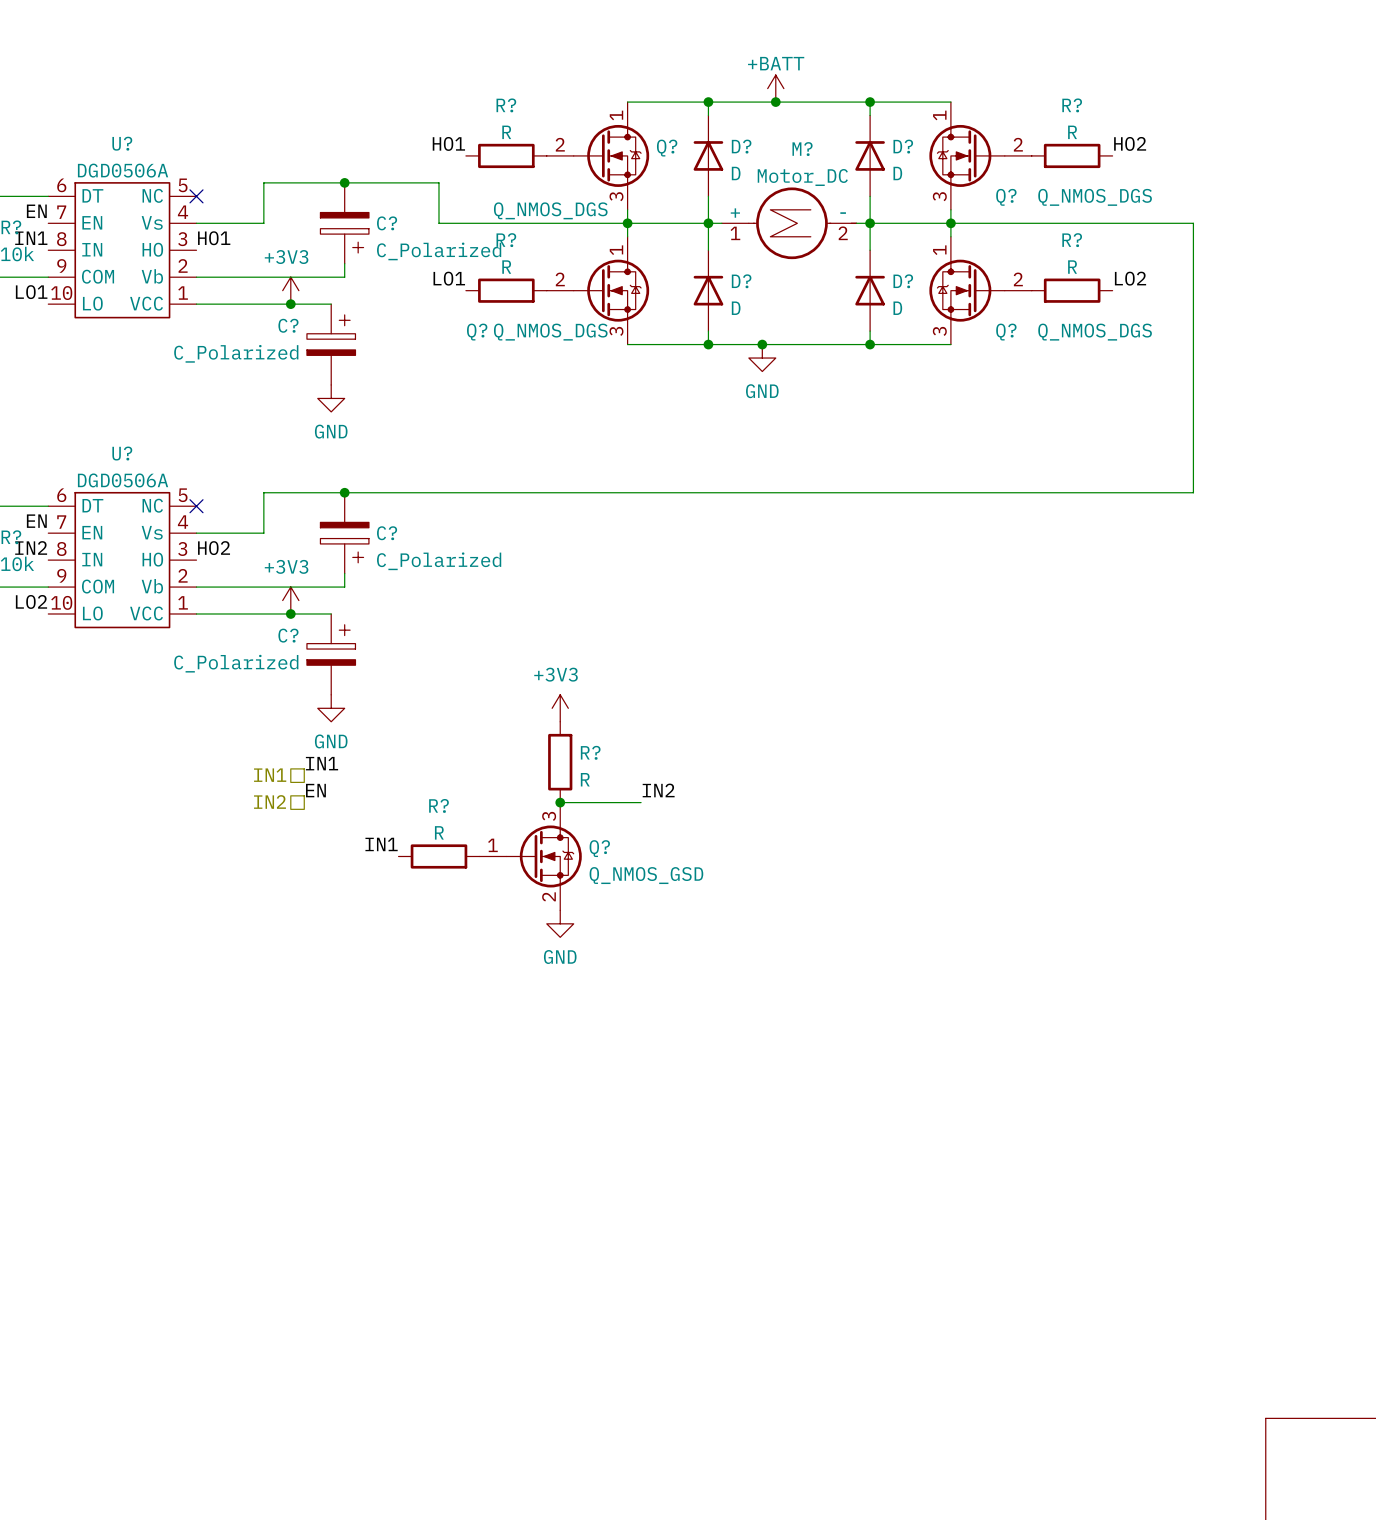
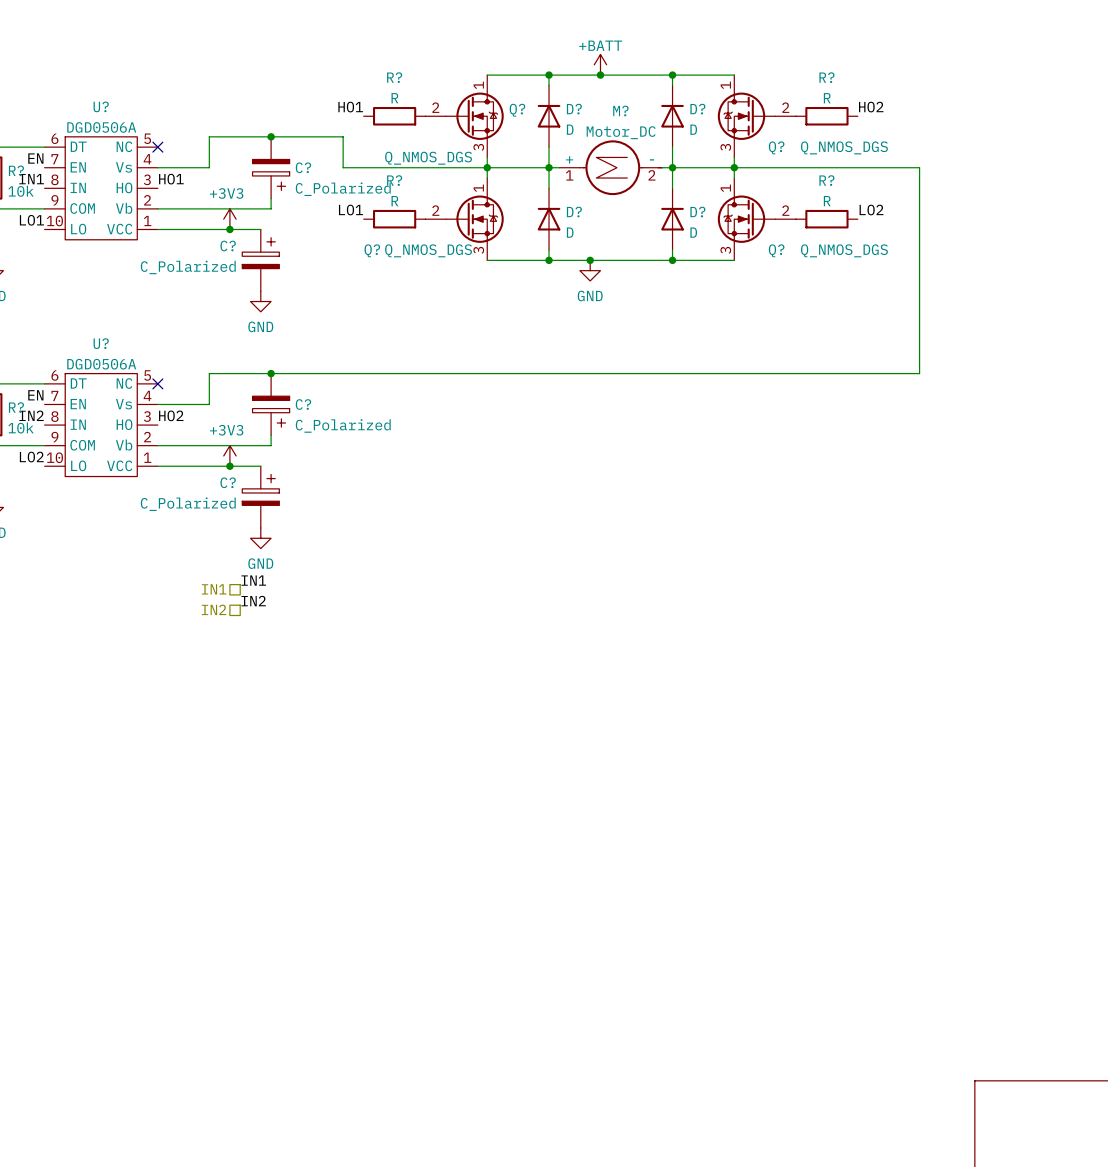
power symbol: +3V3 (560, 708) -> none
R?: R (560, 762) -> none
label: EN (315, 790) -> IN2 (253, 601)
label: IN2 (658, 790) -> none
wire: (560, 802) (641, 802) -> none
junction: (560, 802) -> none
label: IN1 (381, 844) -> none
R?: R (438, 856) -> none
Q?: Q_NMOS_GSD (530, 856) -> none
power symbol: GND (560, 923) -> none

